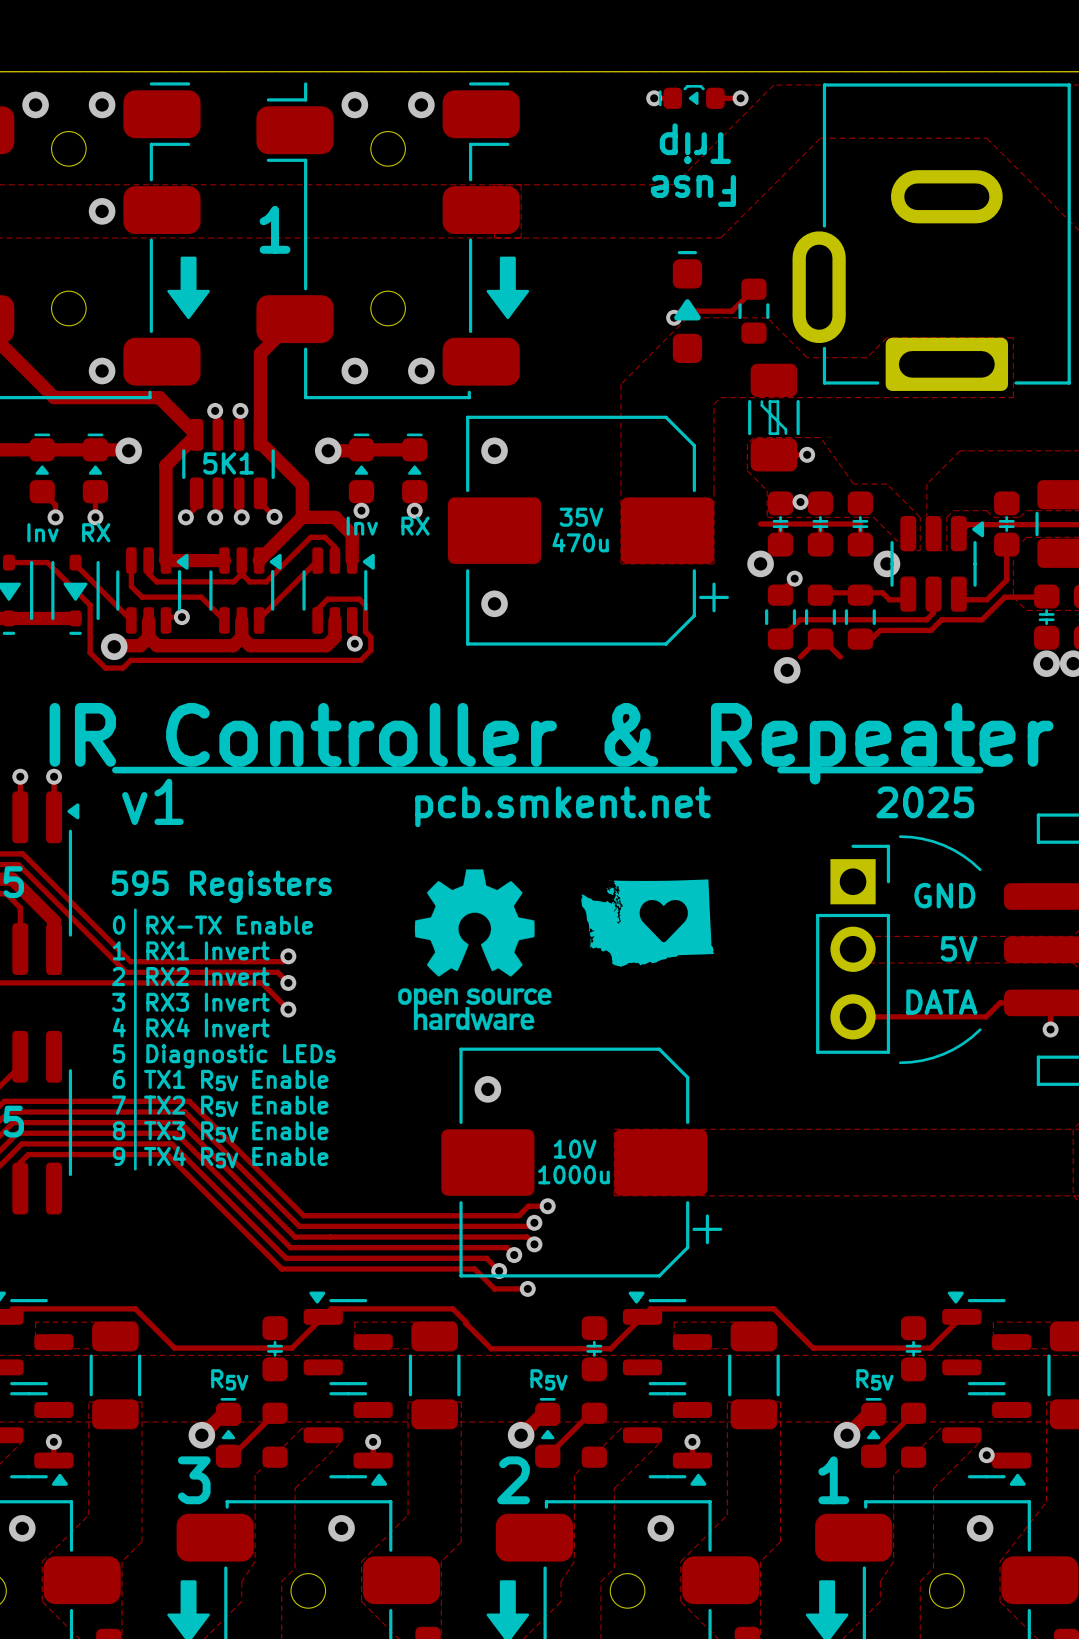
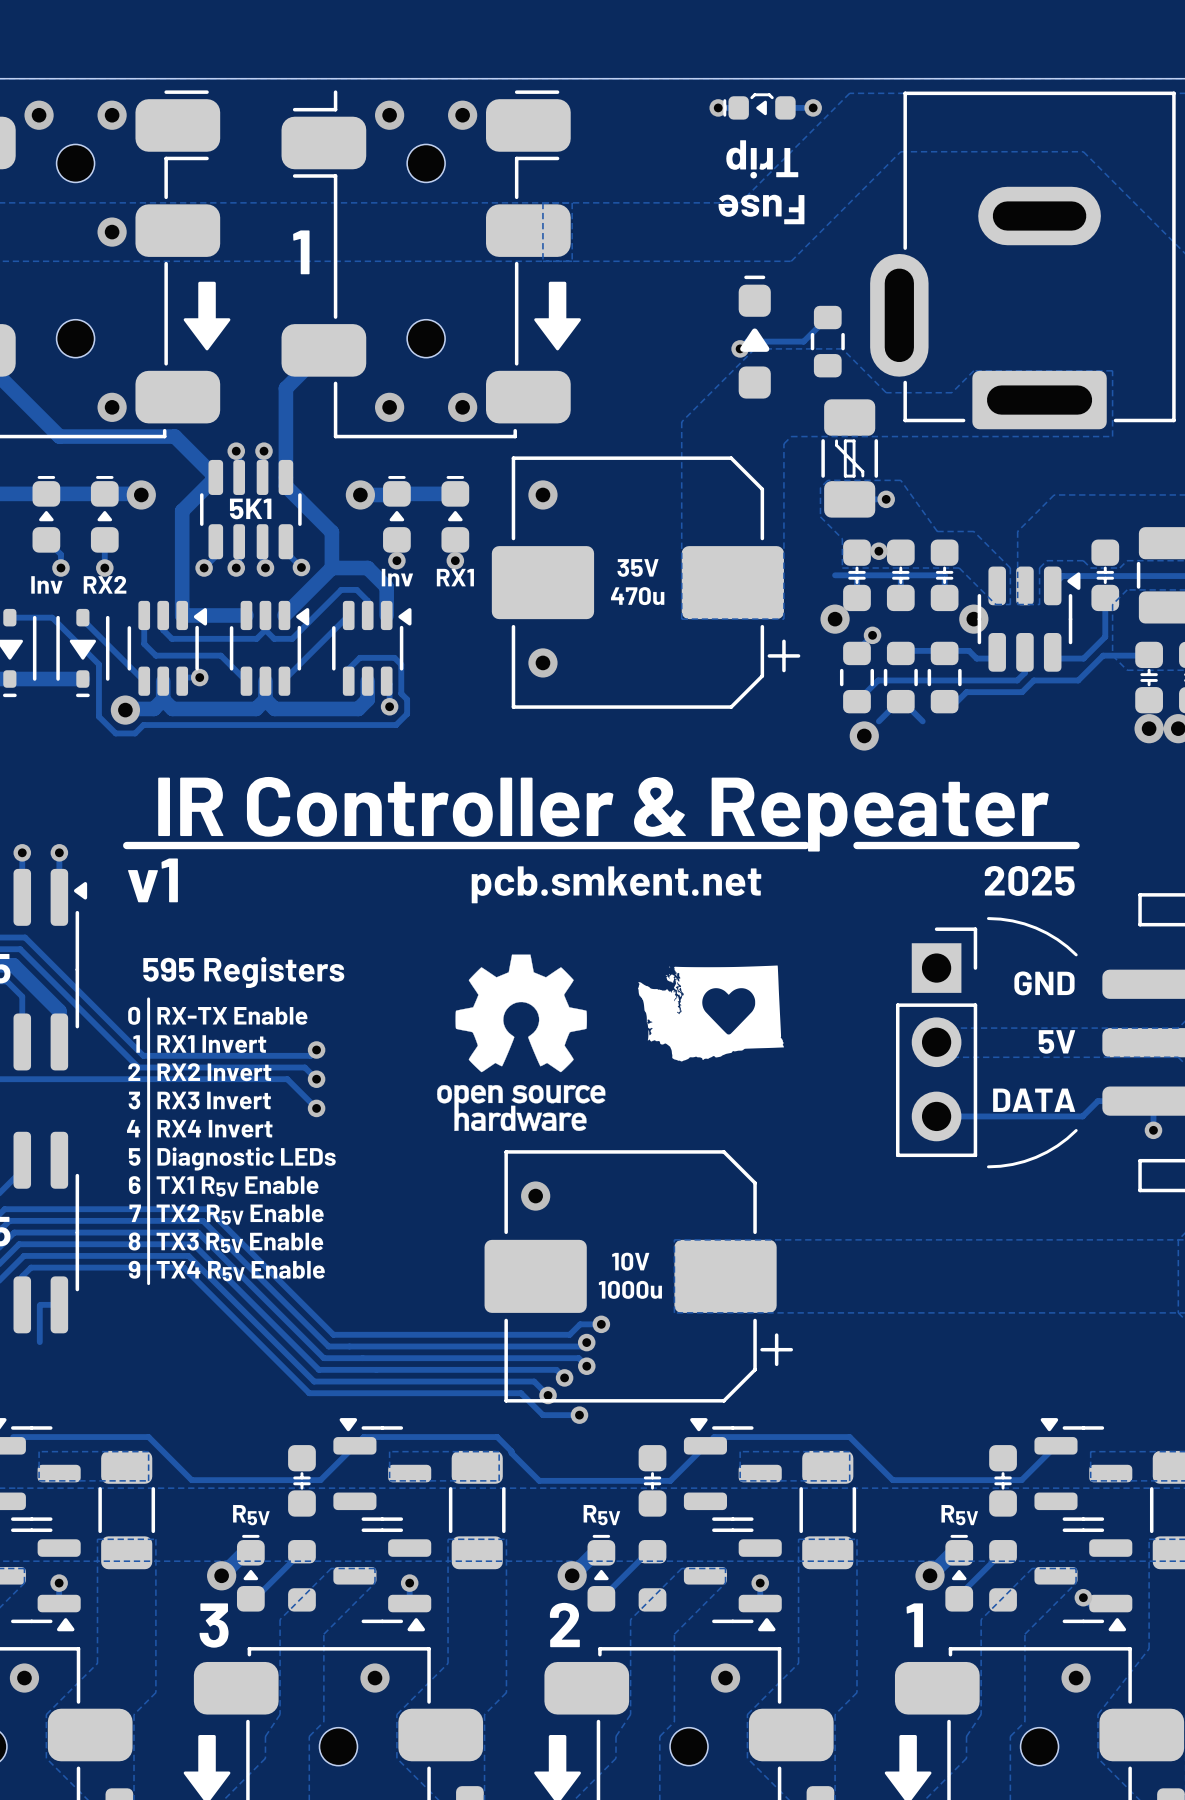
text: RX (415, 526) -> RX1 (455, 577)
text: RX (96, 532) -> RX2 (105, 584)
track: none -> (59, 1304) (39, 1305) (39, 1342)

